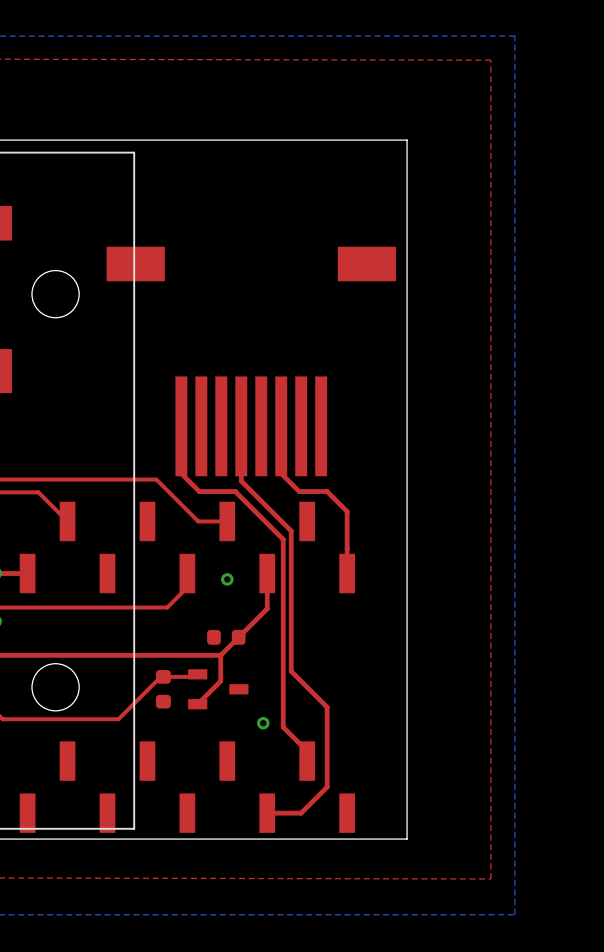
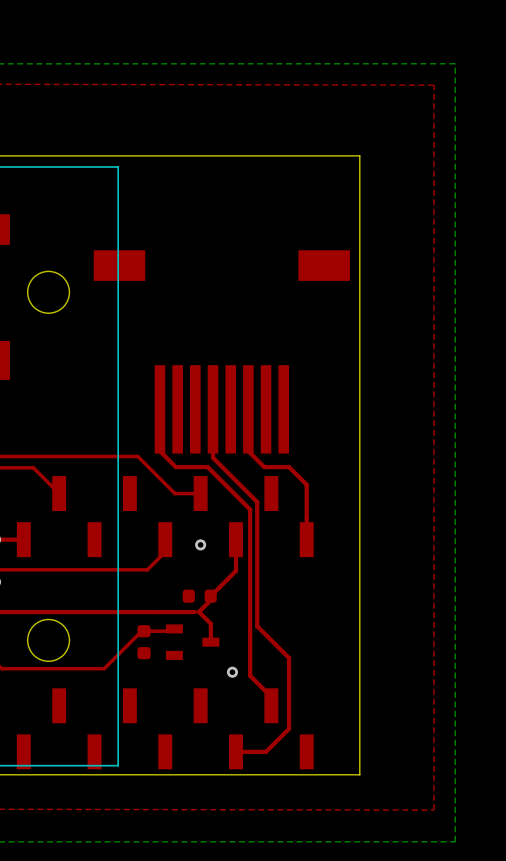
top track: (238, 637) (220, 655) (220, 681) (197, 704) -> (210, 596) (210, 600) (199, 612) (210, 623) (210, 642)

